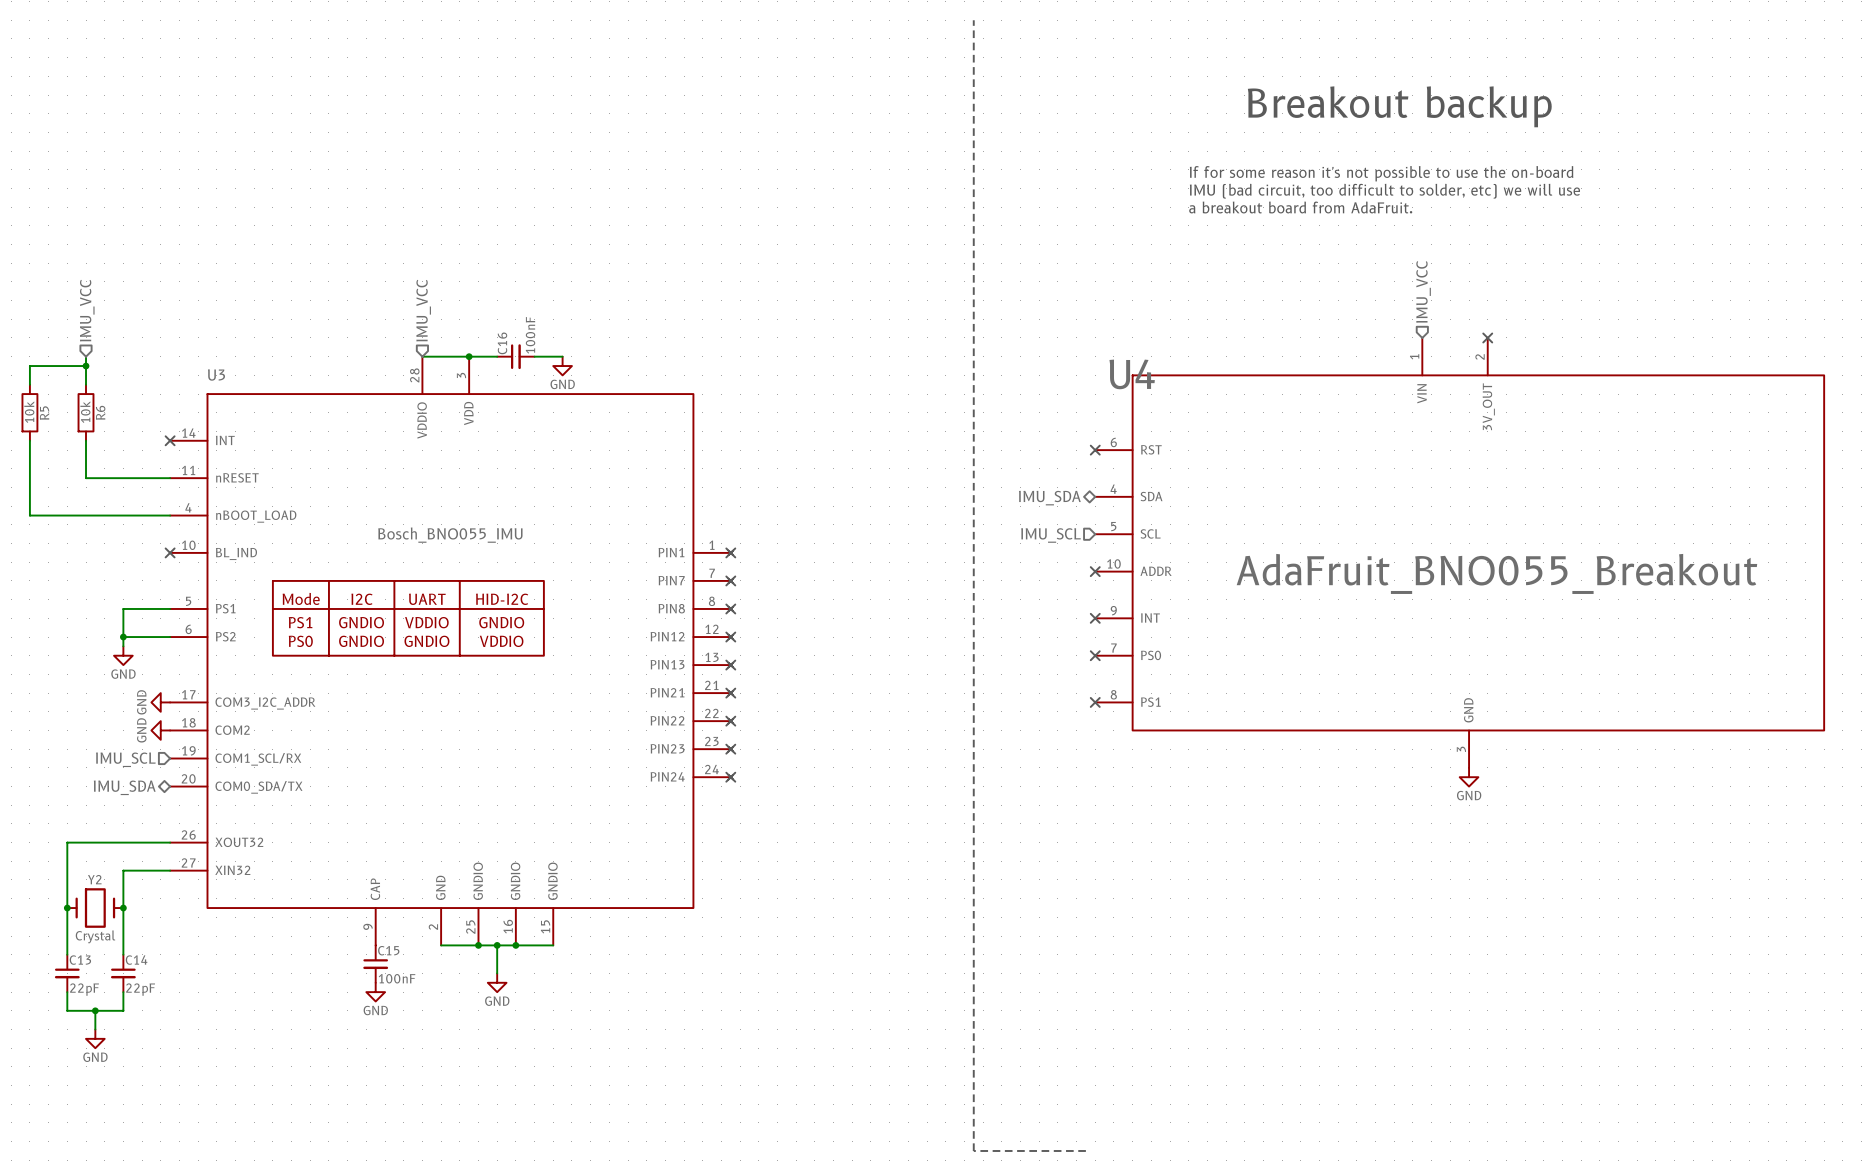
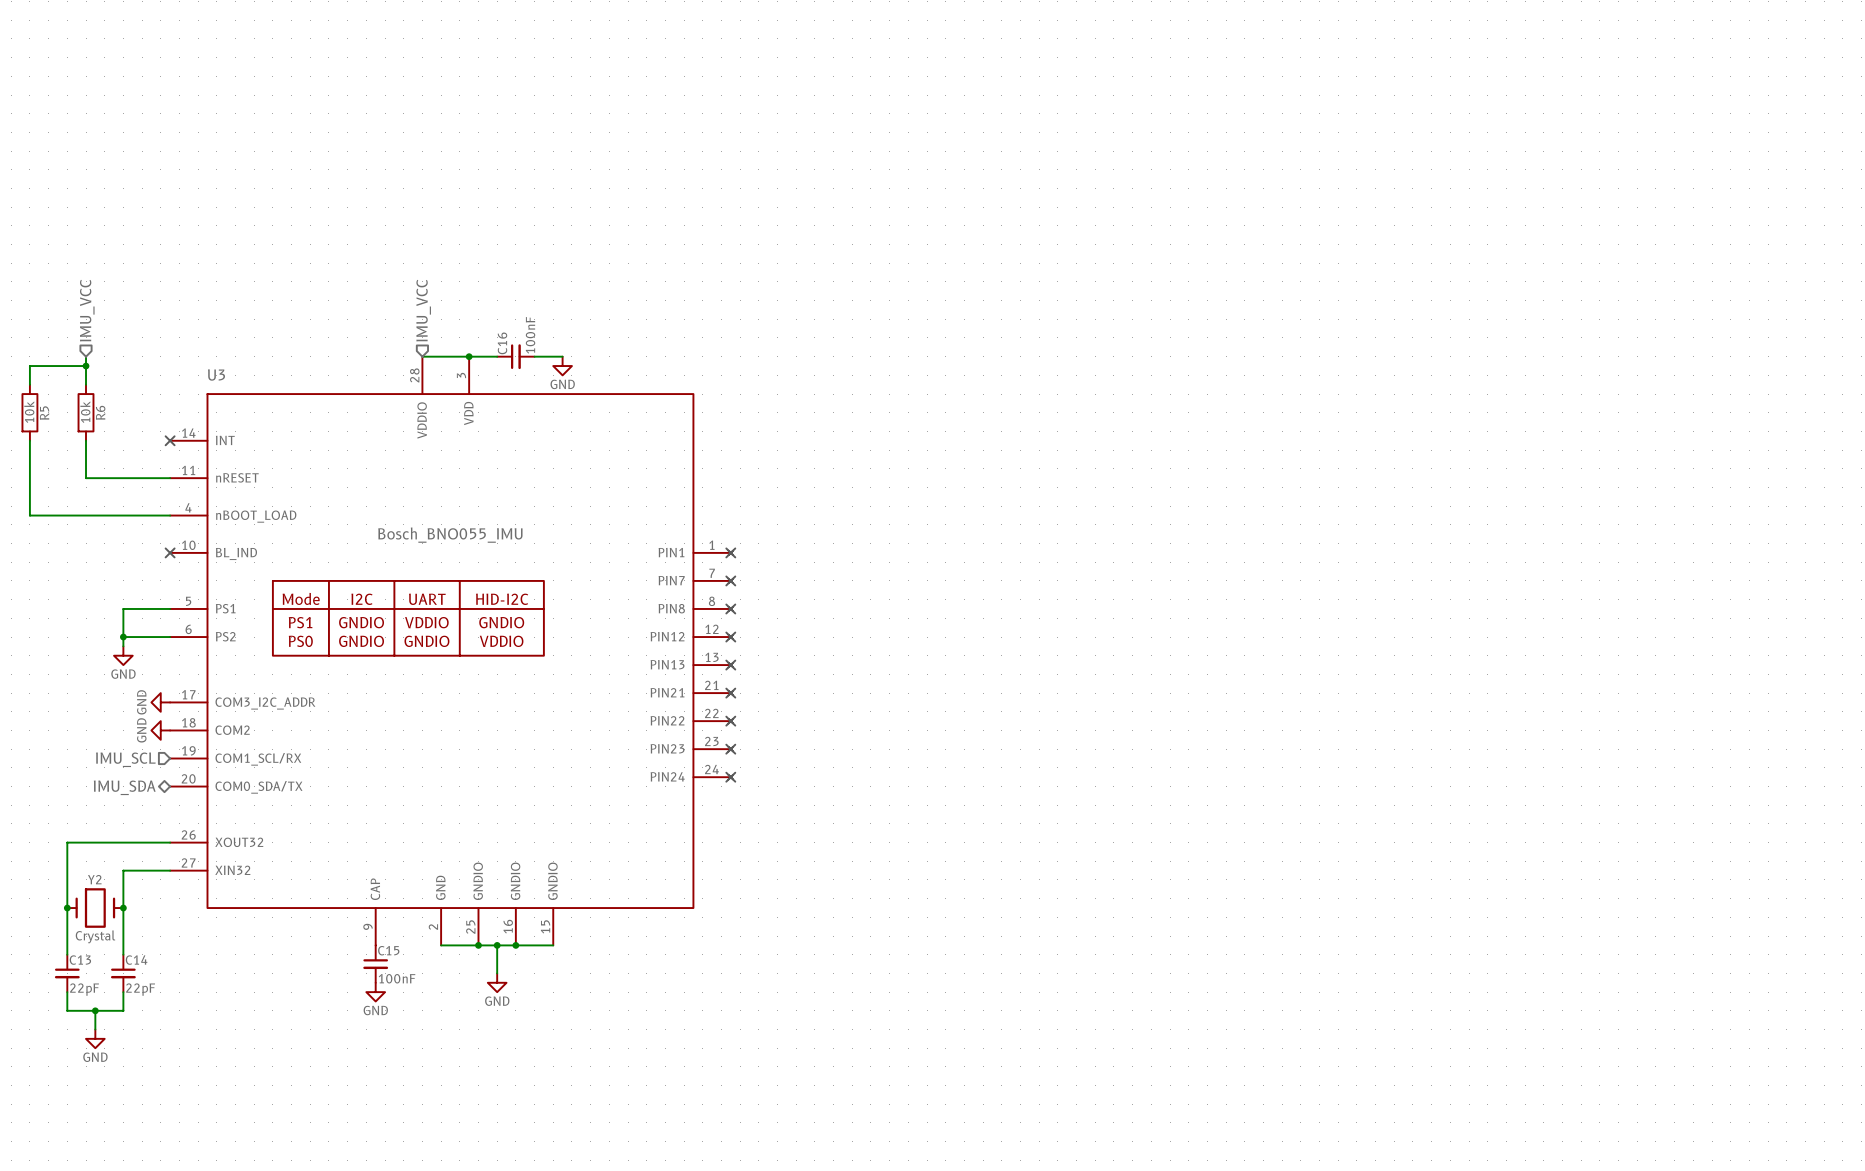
line: (973, 20) (973, 1150) (1085, 1150) -> none
text: Breakout backup (1399, 106) -> none
text: If for some reason it's not possible to use the on-board (1381, 173) -> none
text: IMU (bad circuit, too difficult to solder, etc) we will use (1384, 191) -> none
text: a breakout board from AdaFruit. (1300, 207) -> none
hierarchical label: IMU_VCC (1423, 291) -> none
no-connect mark: (1487, 337) -> none
no-connect mark: (1095, 450) -> none
hierarchical label: IMU_SDA (1049, 498) -> none
hierarchical label: IMU_SCL (1050, 535) -> none
U4: AdaFruit_BNO055_Breakout (1459, 552) -> none
no-connect mark: (1095, 571) -> none
no-connect mark: (1095, 618) -> none
no-connect mark: (1095, 655) -> none
no-connect mark: (1095, 702) -> none
power symbol: GND (1469, 777) -> none

